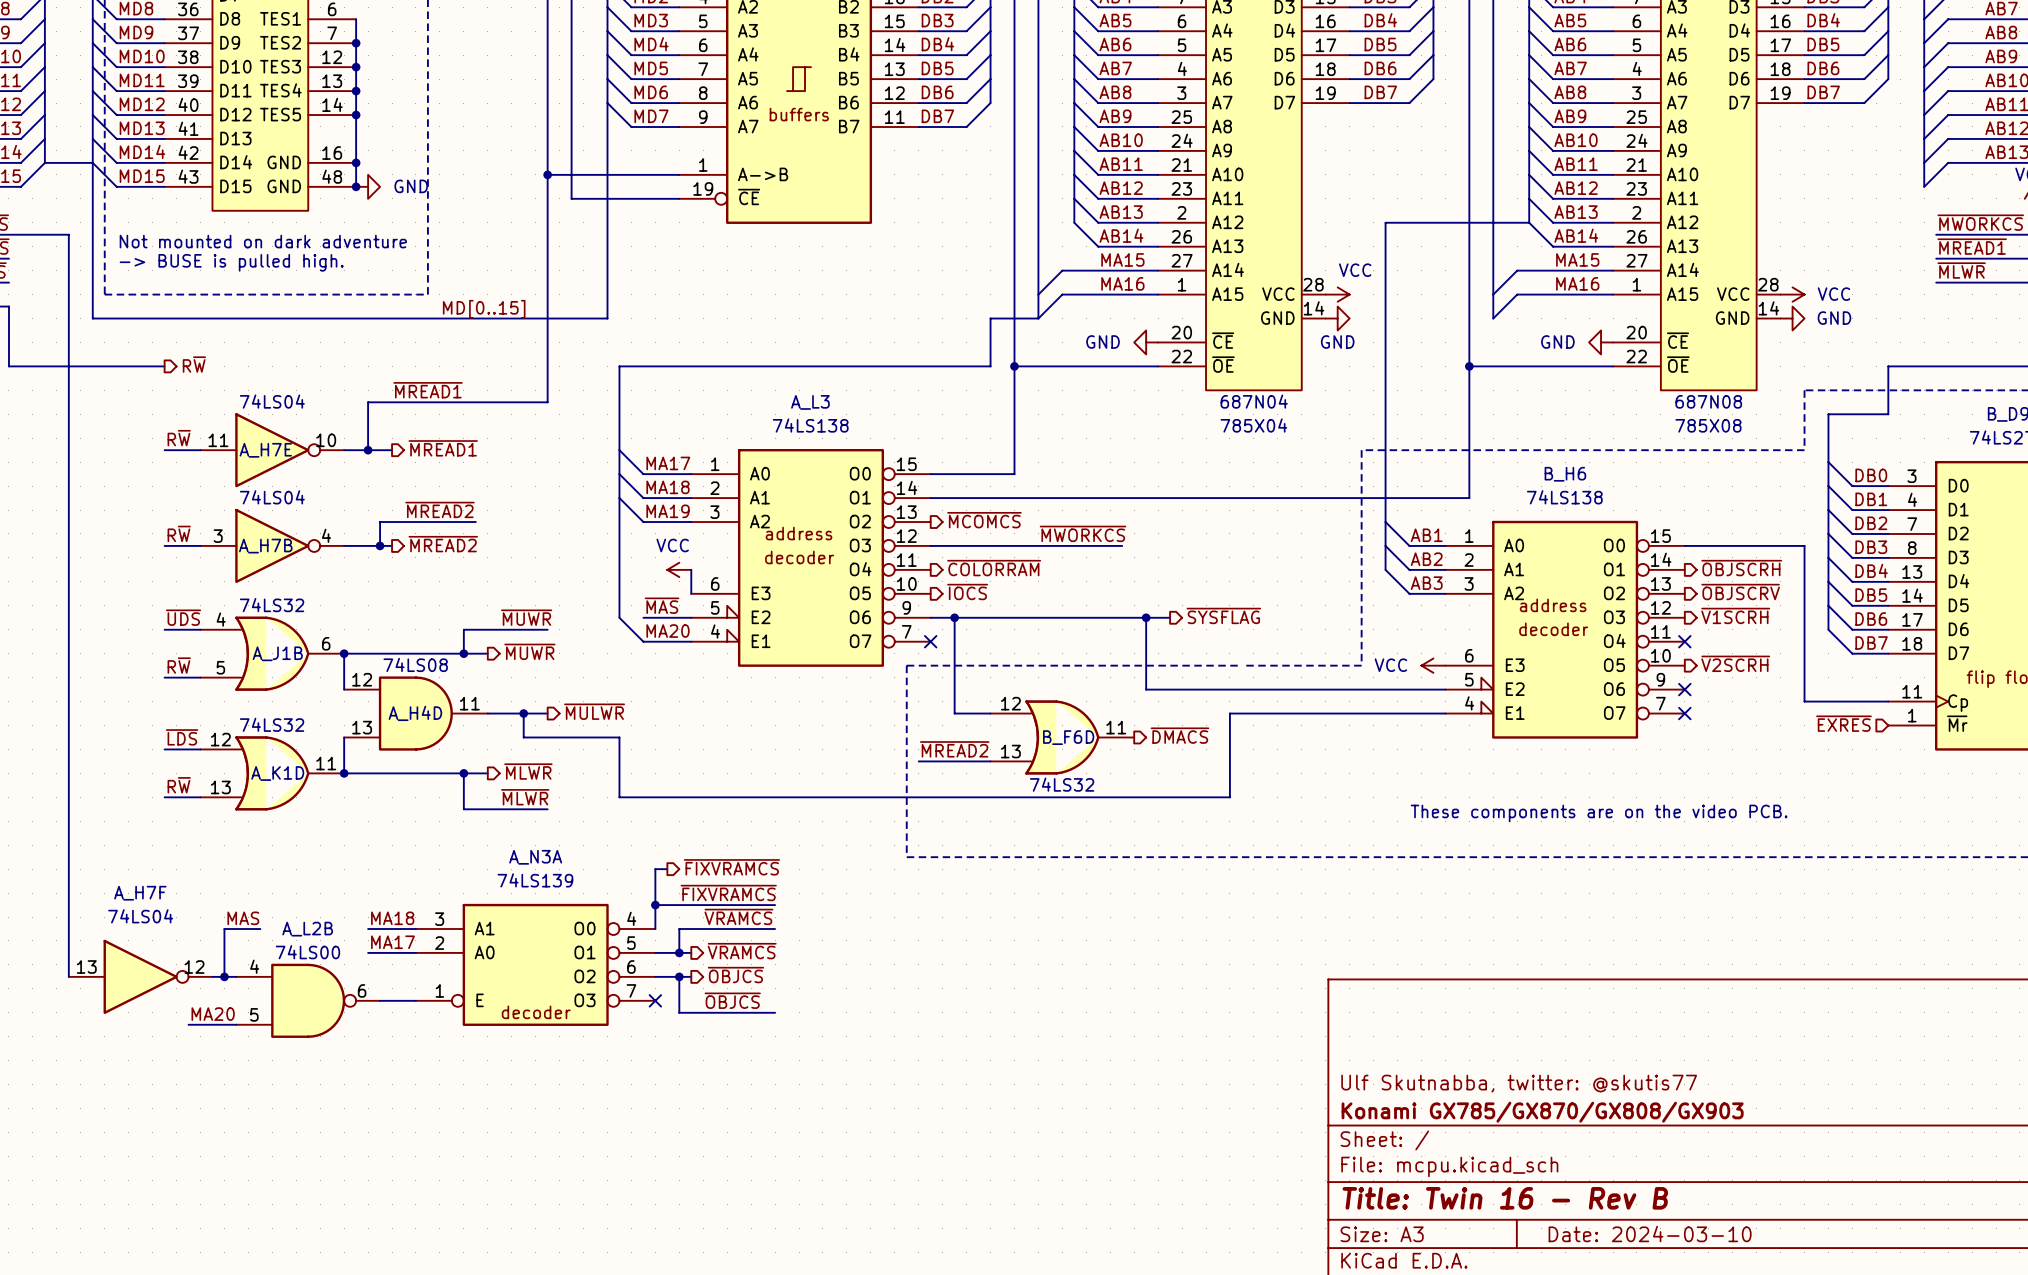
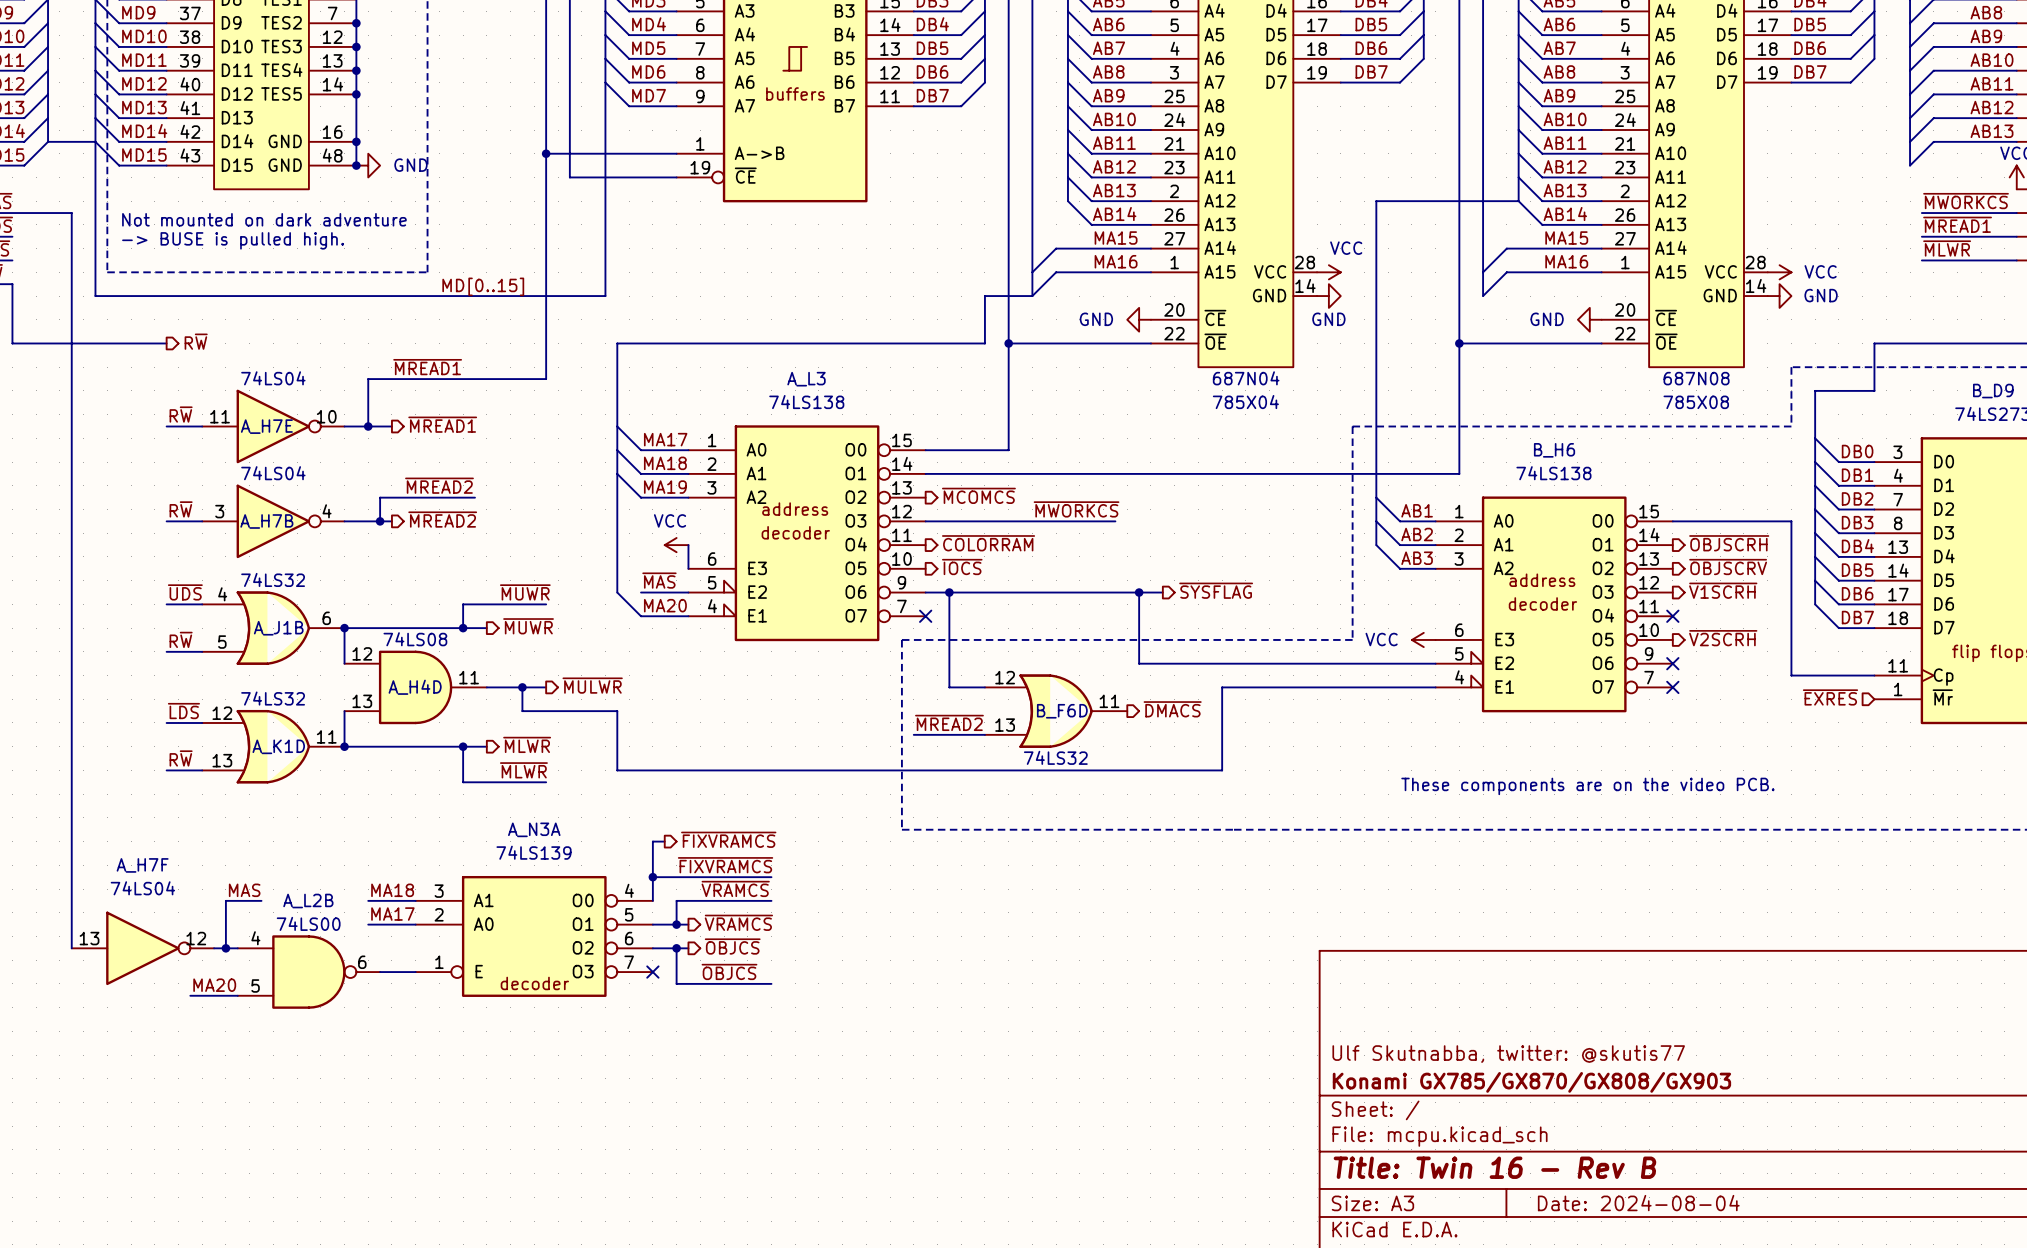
title block: Date: 2024-03-10 (1650, 1233) -> Date: 2024-08-04 (1638, 1203)

